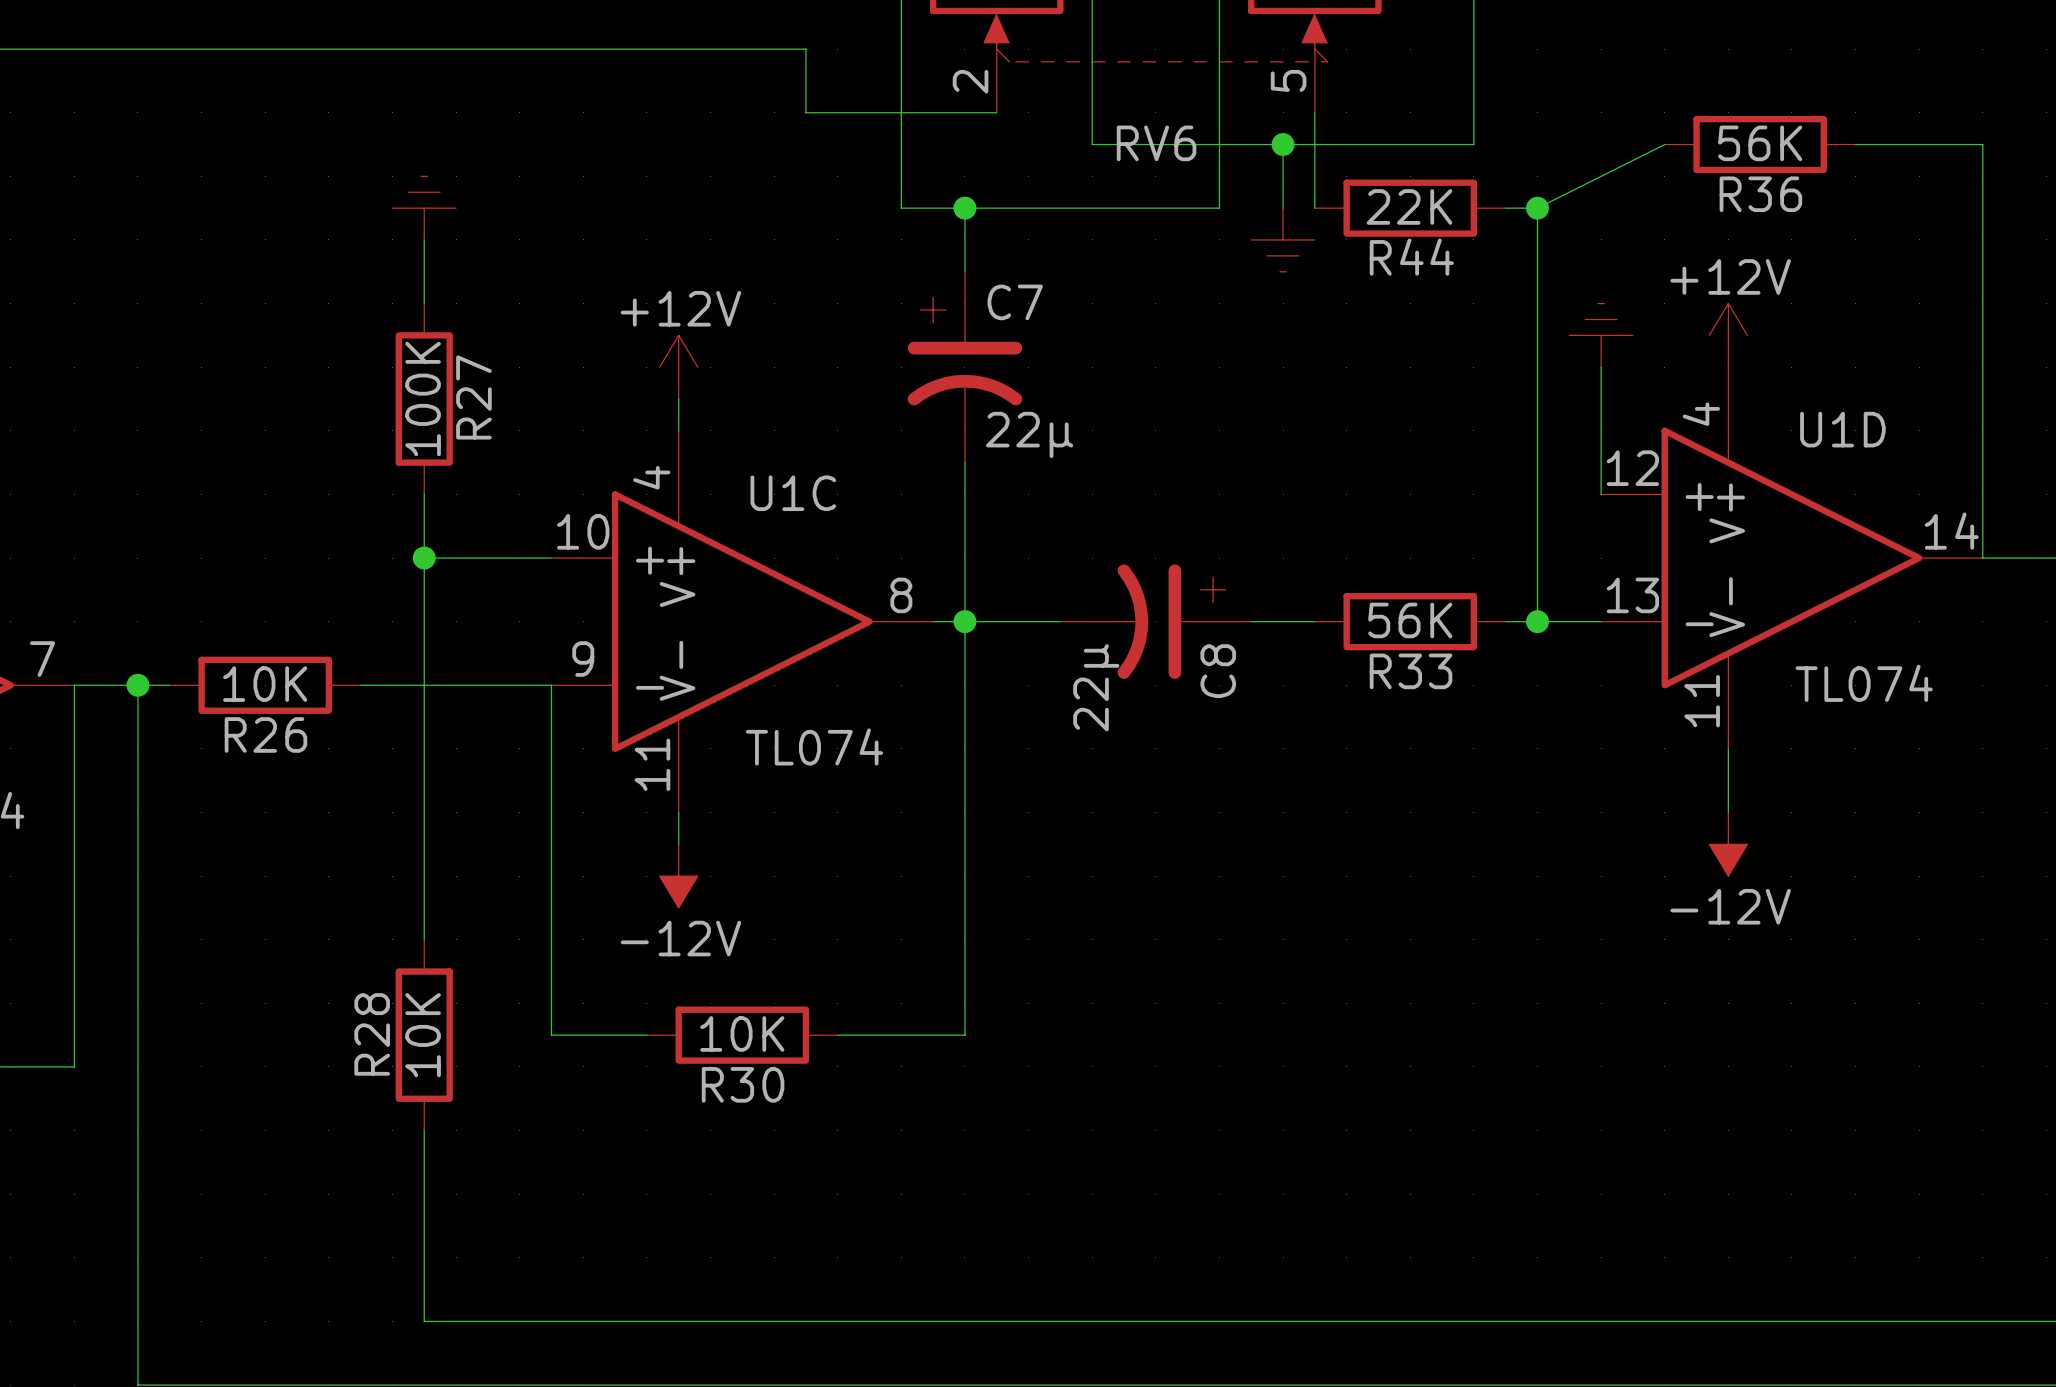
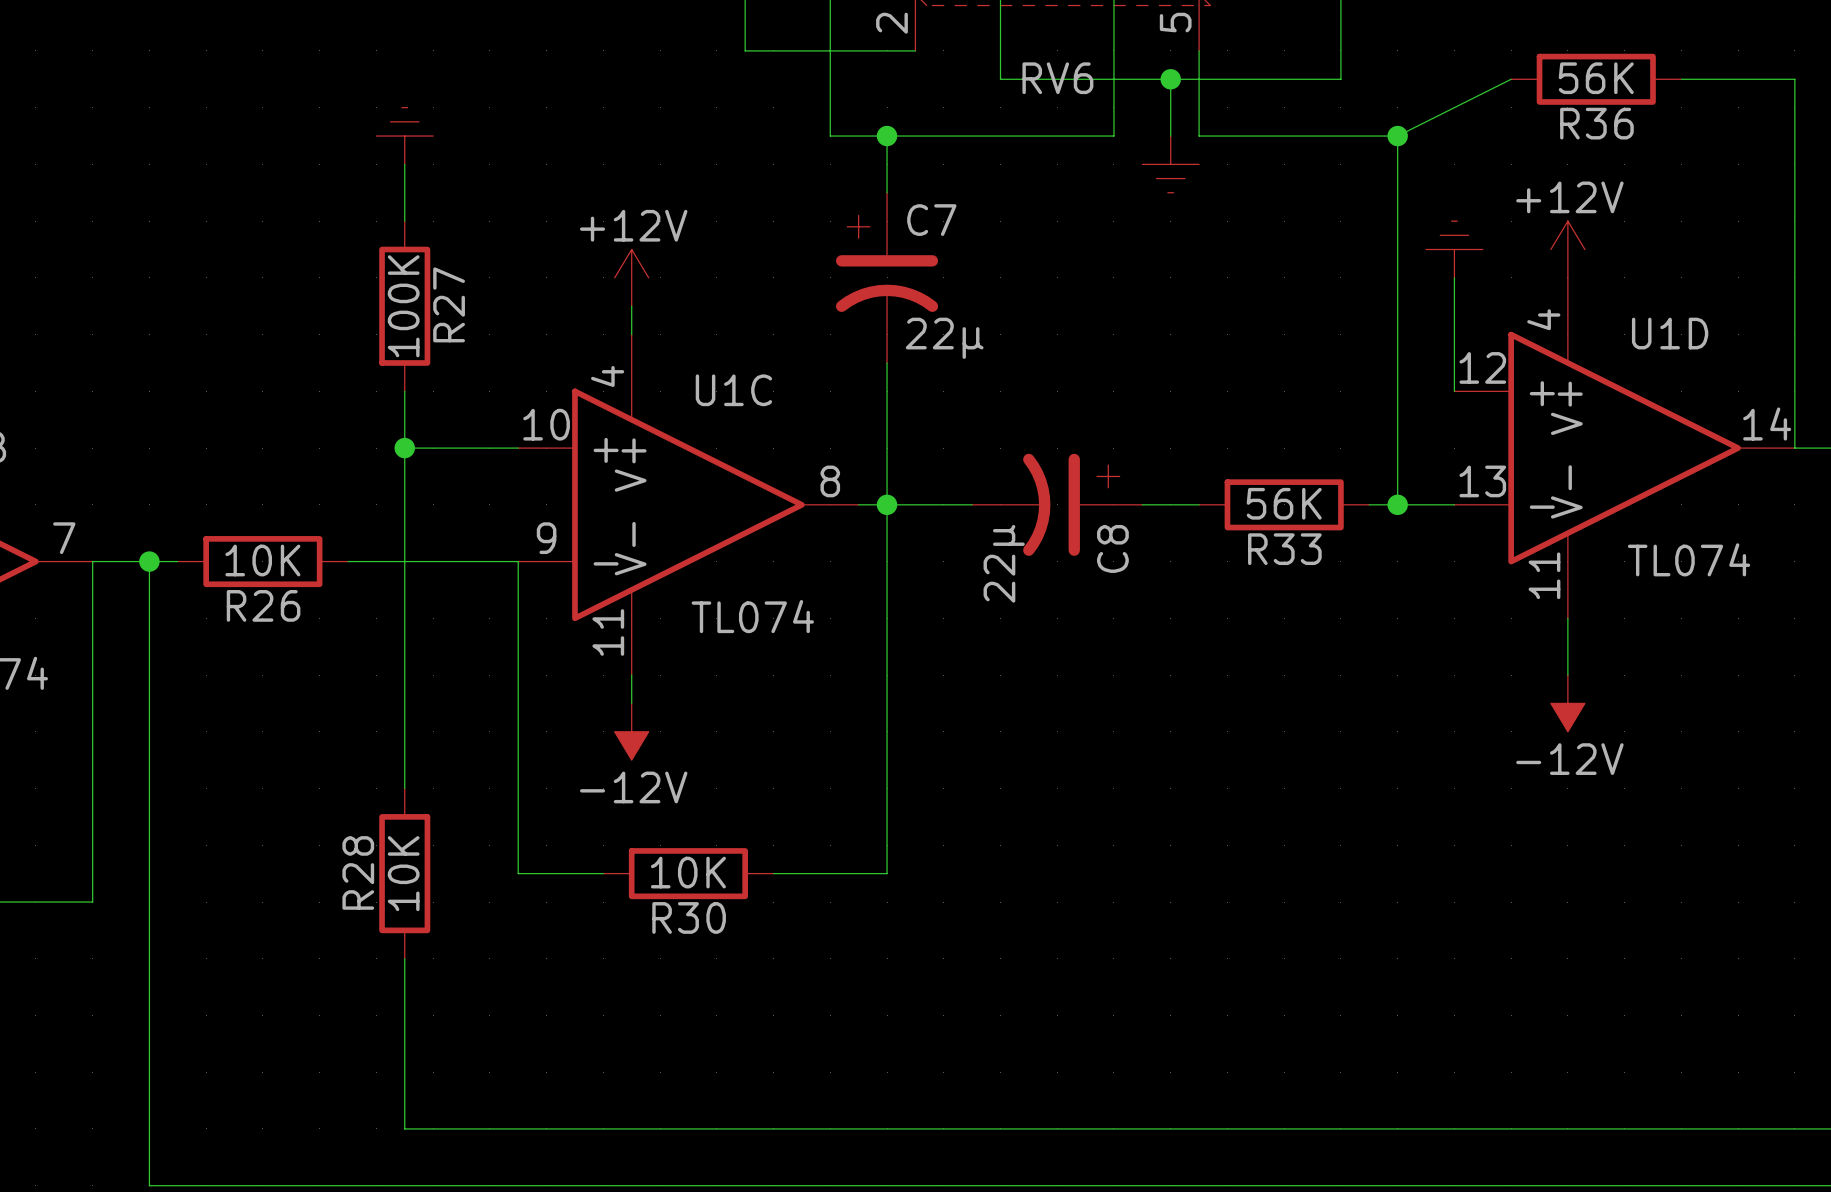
wire: none -> (1199, 136) (1369, 136)
R44: 22K (1410, 208) -> none

